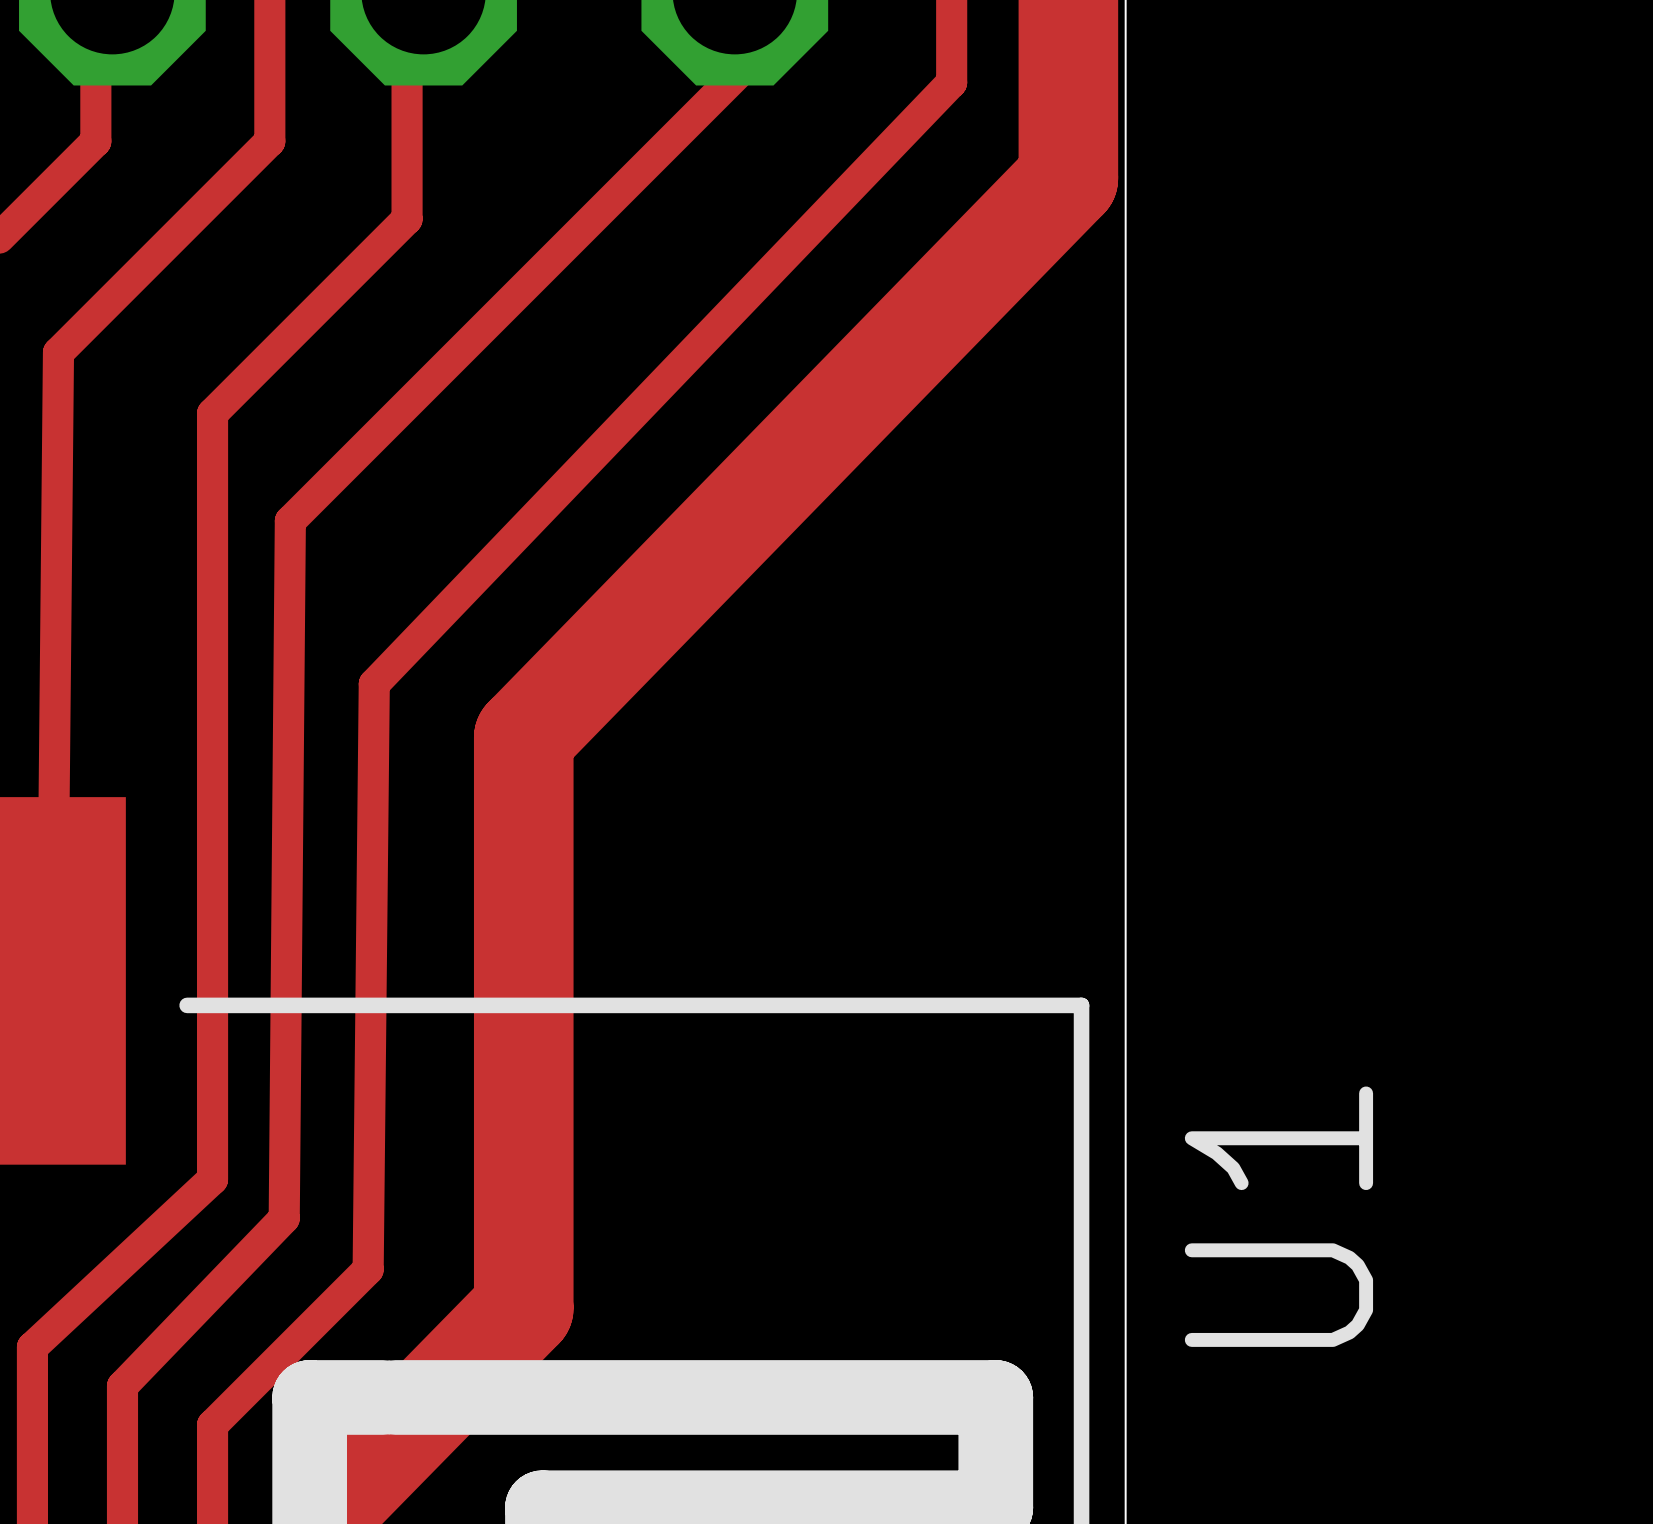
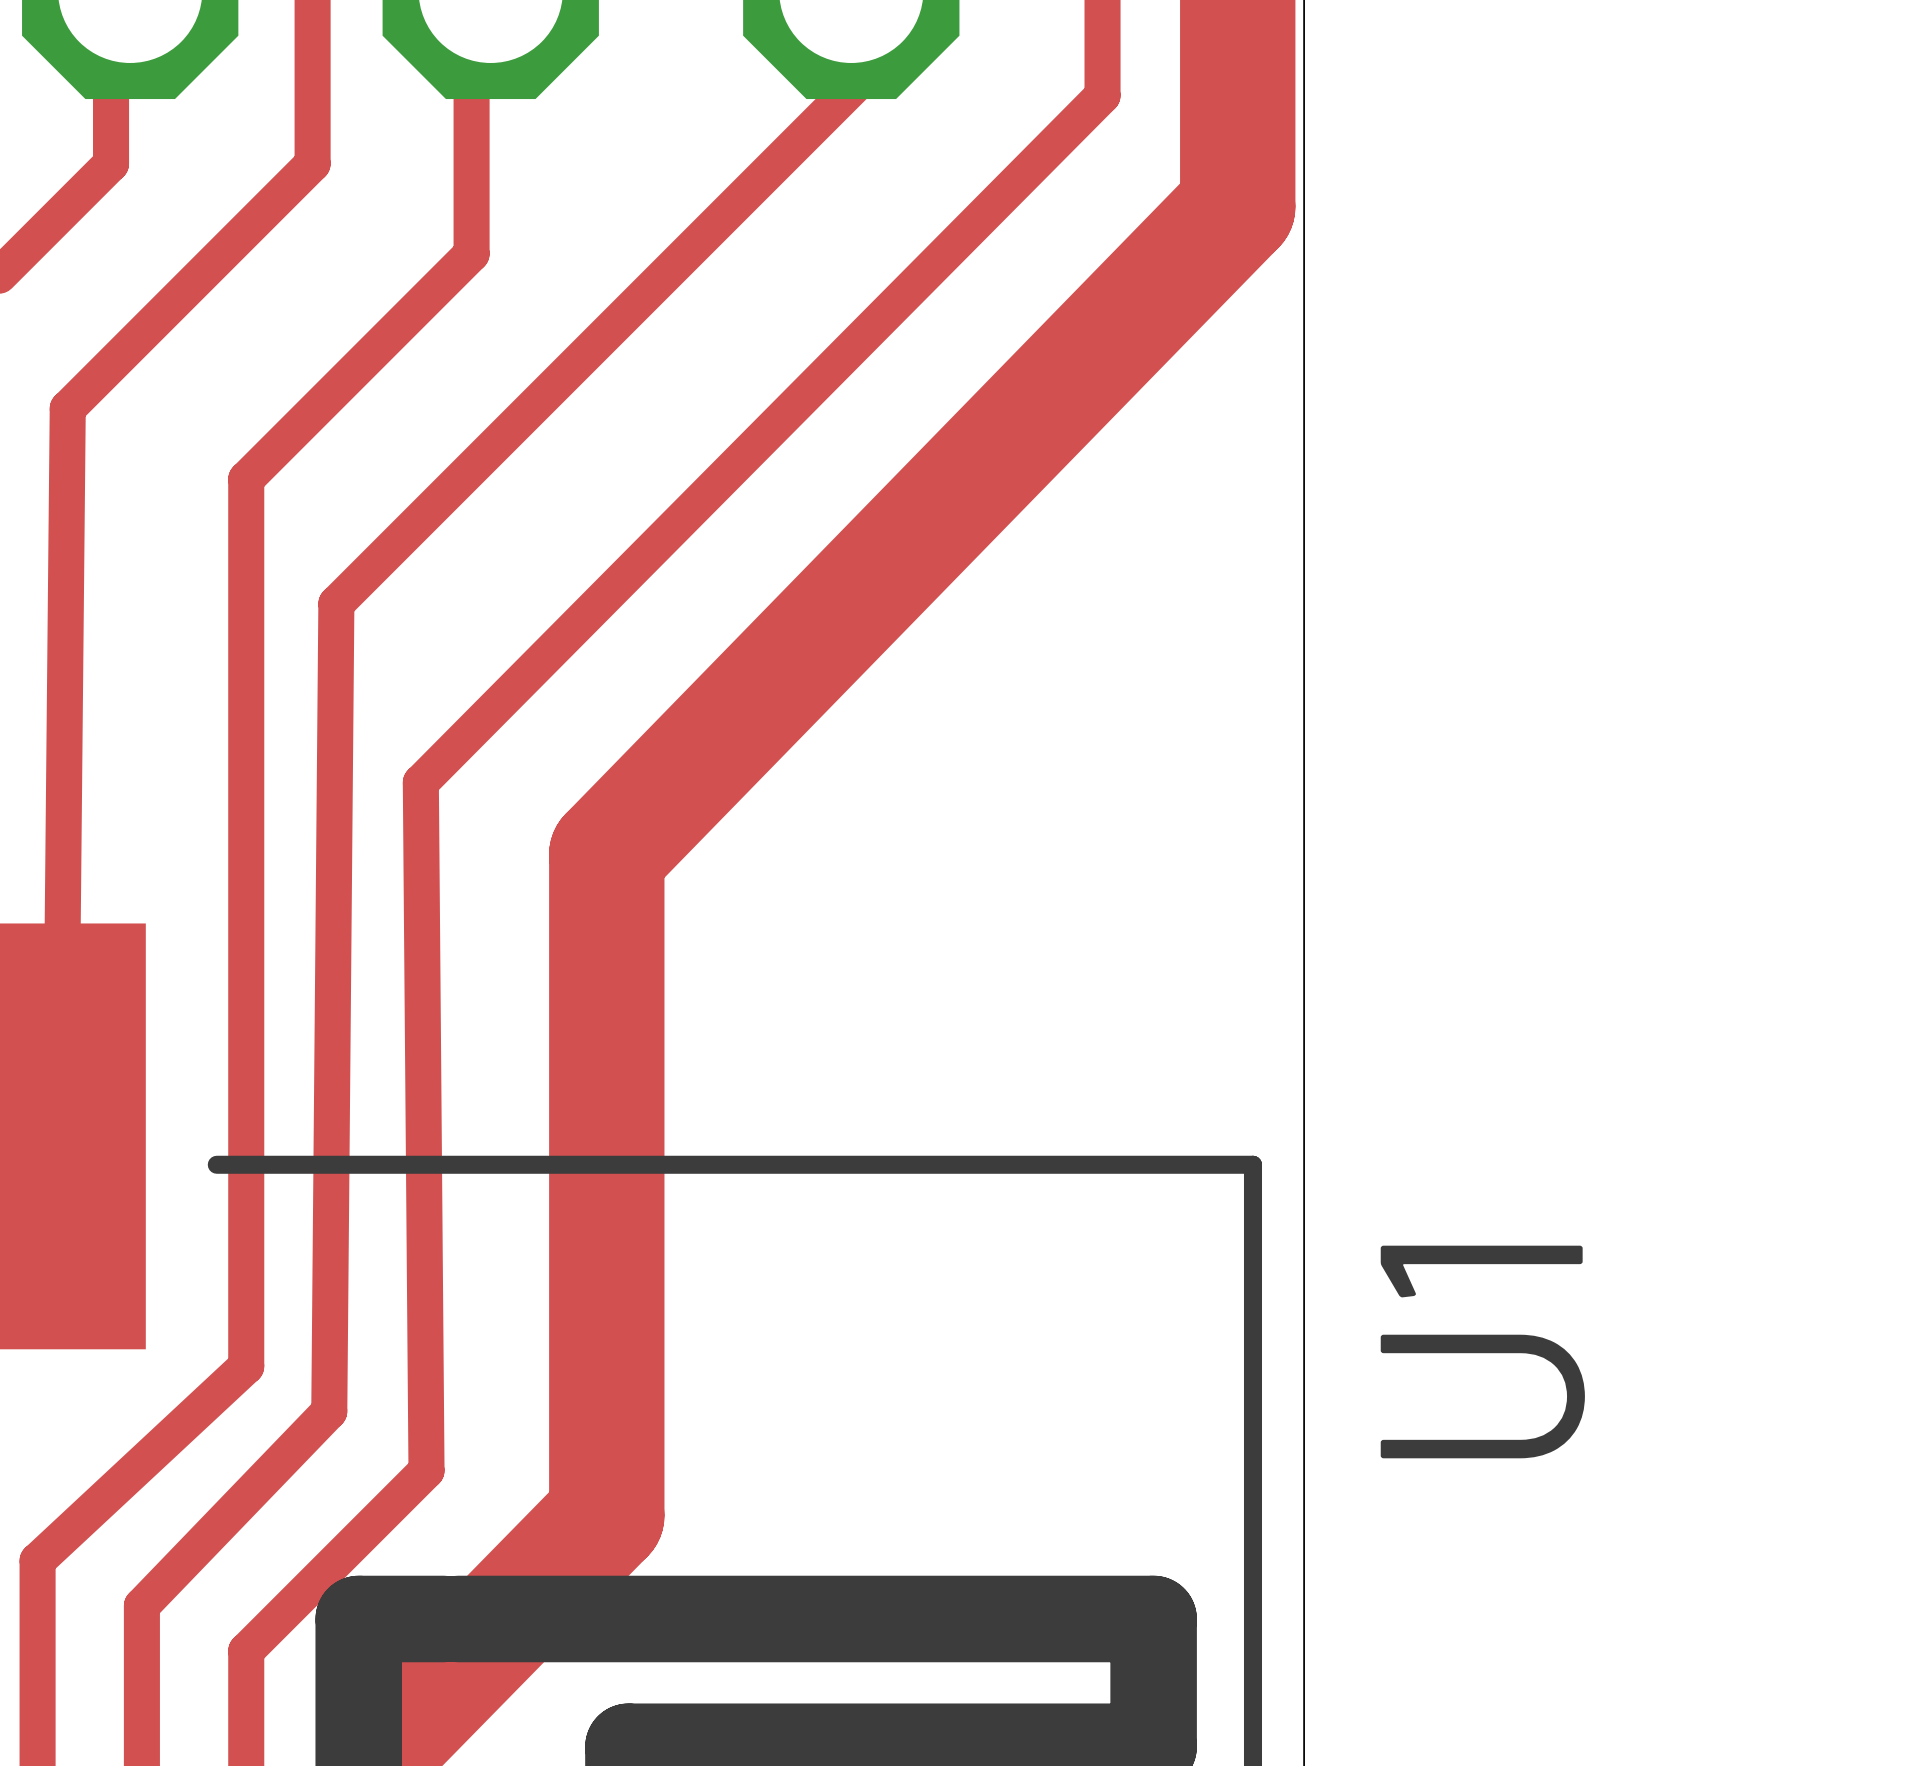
top track: (951, 82) (374, 684) (368, 1269) -> (1102, 95) (420, 782) (426, 1470)

